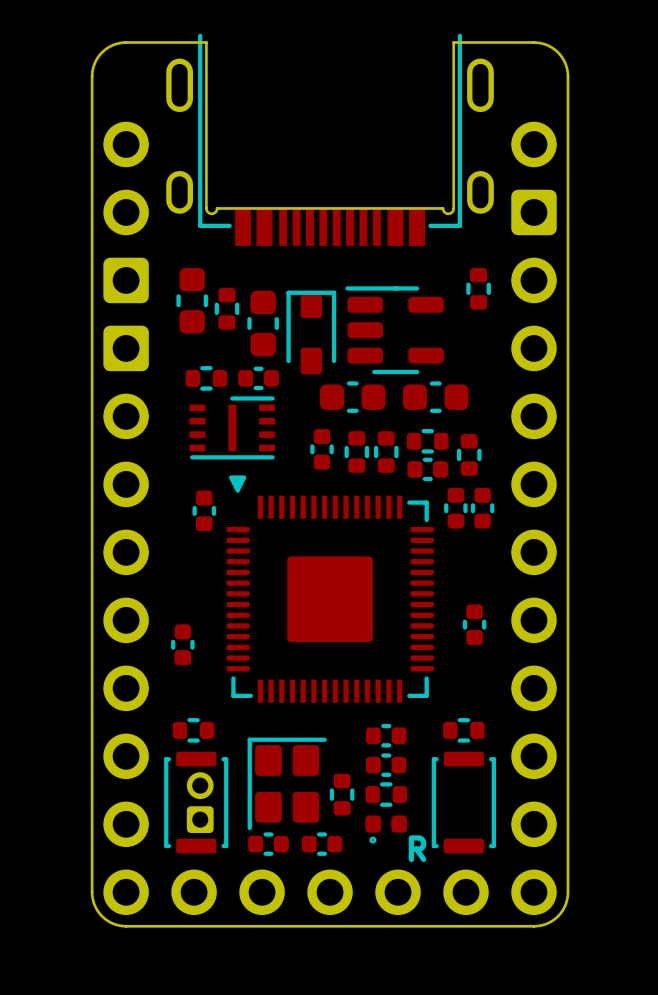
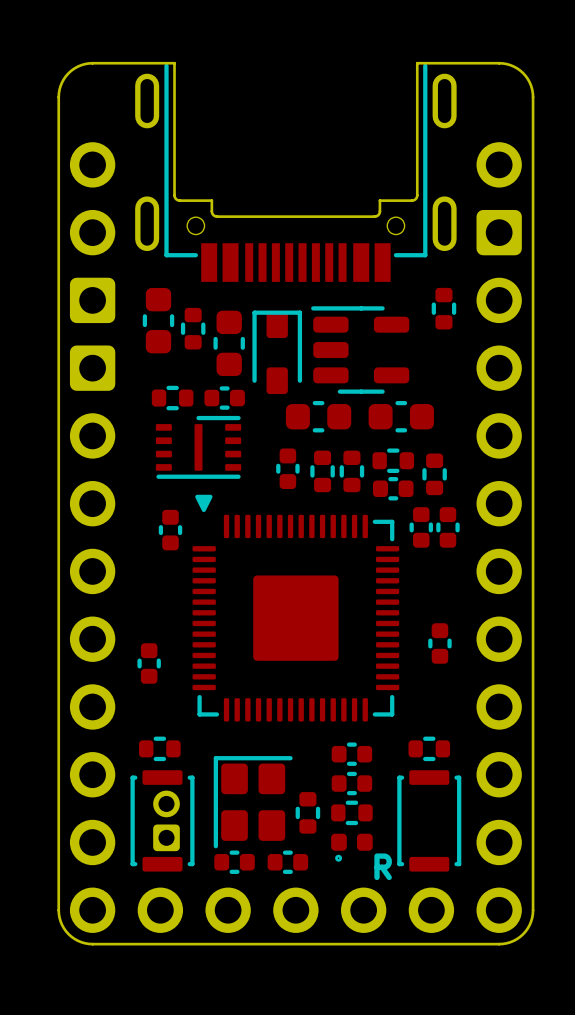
part footprint: [166, 33, 494, 246] -> [135, 63, 457, 282]
board edge: (206, 42) (206, 208) (208, 212) (213, 213) (217, 208) (443, 208) (444, 212) (448, 213) (452, 212) (453, 208) (453, 42) -> (172, 63) (174, 63) (174, 196) (179, 200) (211, 200) (212, 212) (217, 216) (375, 216) (379, 212) (379, 200) (415, 199) (417, 195) (417, 63) (419, 63)

